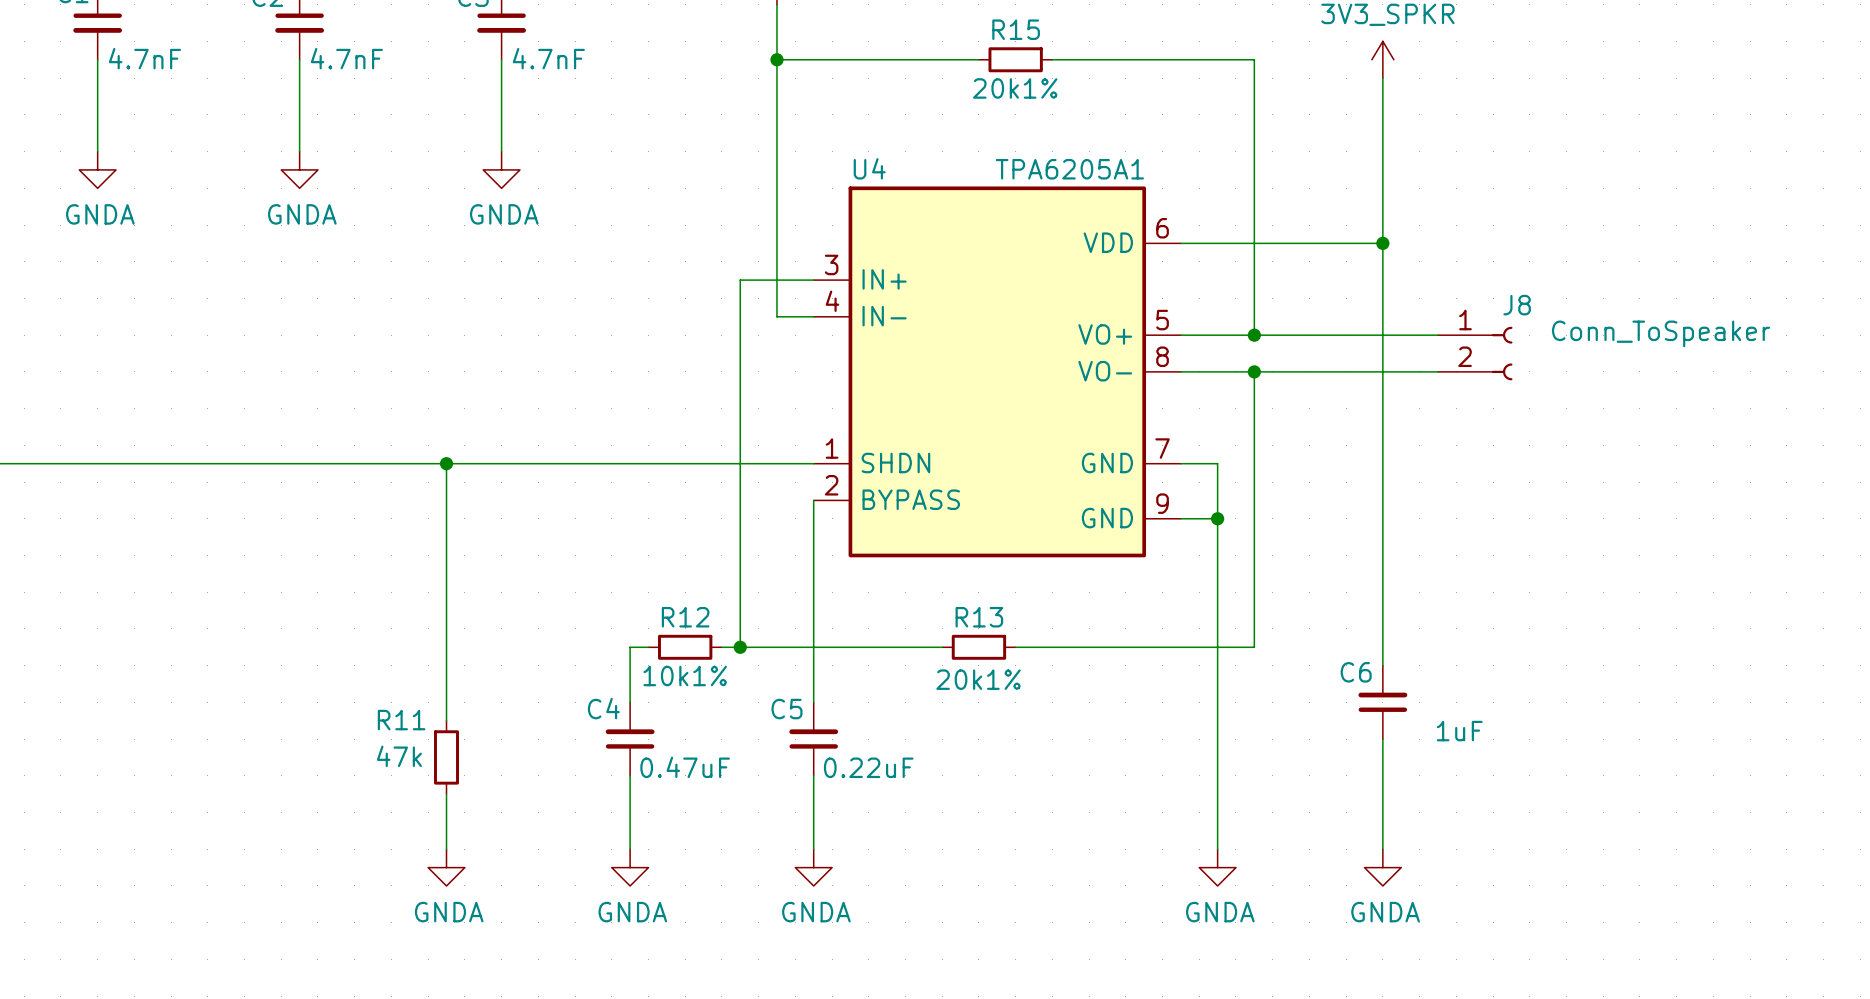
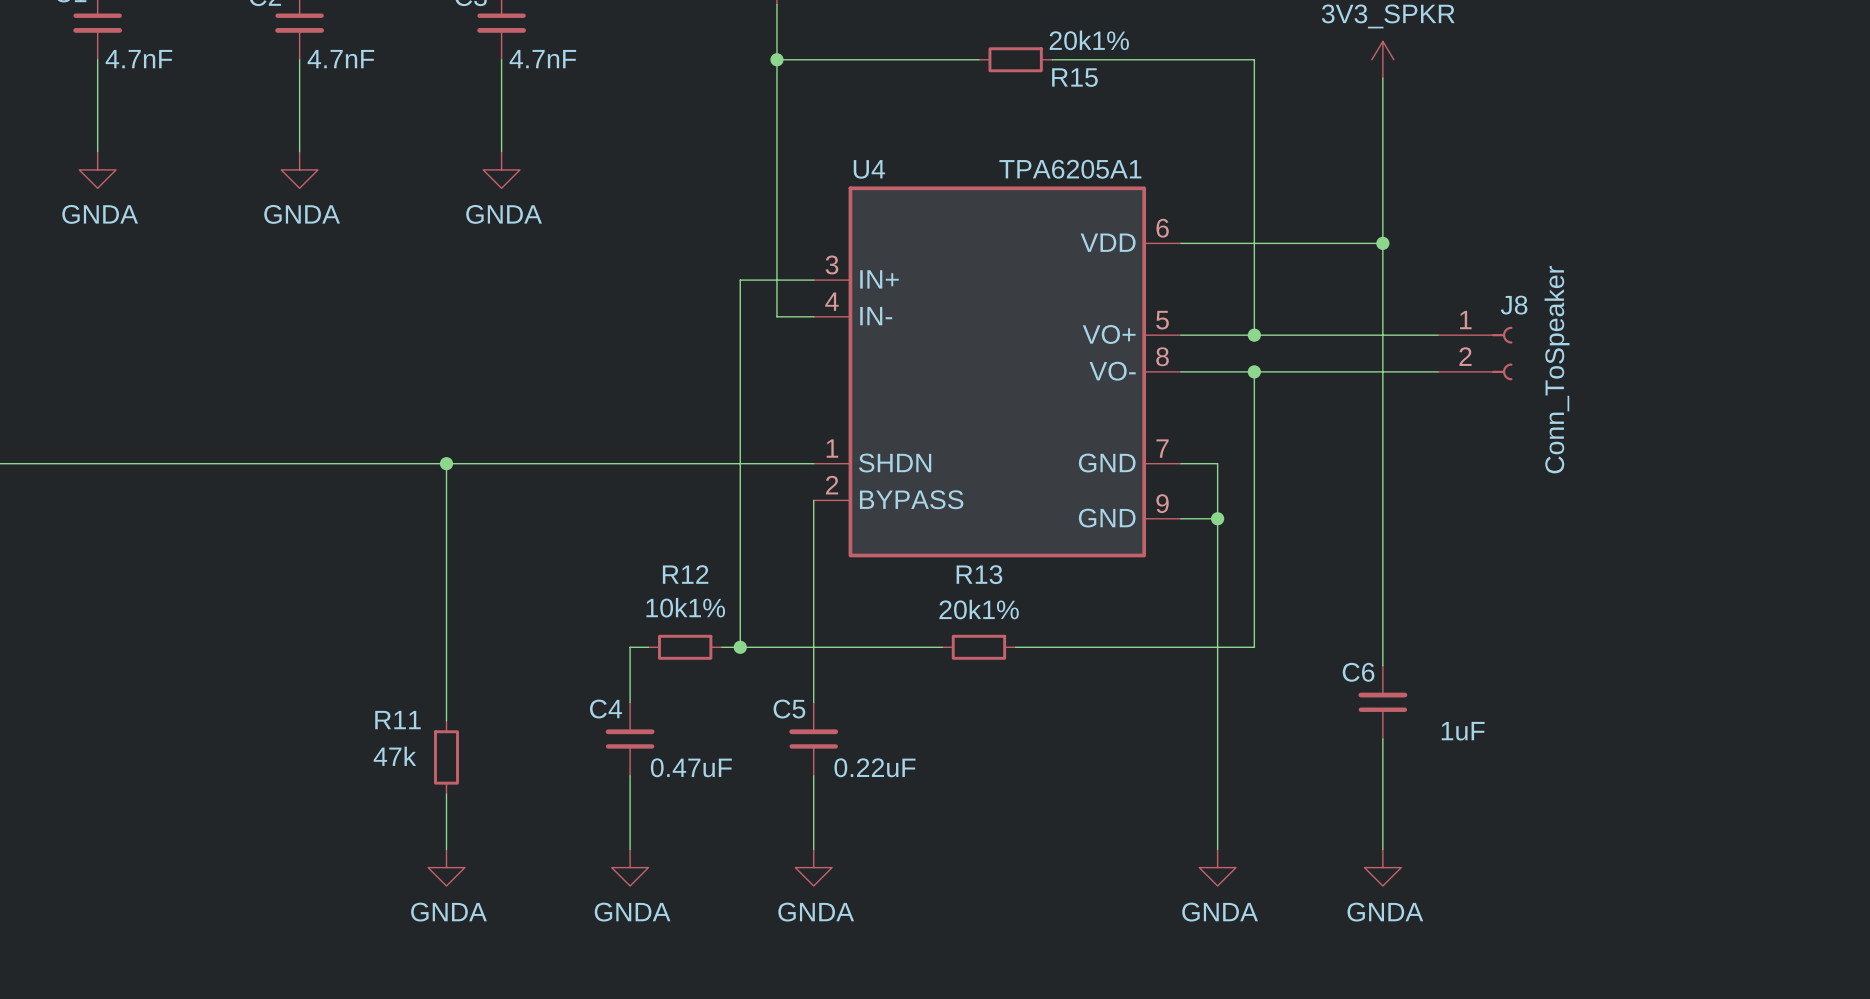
R15 name position: R15 (1016, 29) -> R15 (1074, 77)
R15 value position: 20k1% (1015, 88) -> 20k1% (1089, 40)
J8 value rotation: 0° (1661, 333) -> 90° counterclockwise (1557, 369)
R12 name position: R12 (685, 617) -> R12 (685, 574)
R13 name position: R13 (979, 617) -> R13 (979, 574)
R12 value position: 10k1% (685, 675) -> 10k1% (685, 607)
R13 value position: 20k1% (978, 679) -> 20k1% (979, 609)

